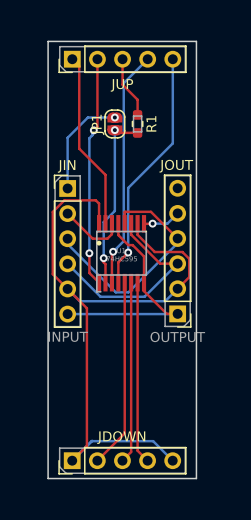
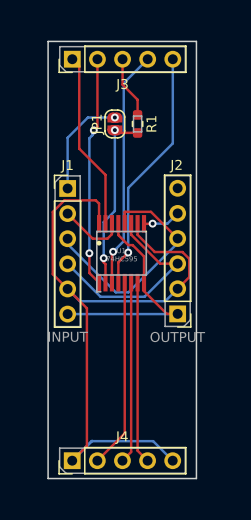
JUP name: JUP (121, 85) -> J3 (121, 85)
JIN name: JIN (66, 166) -> J1 (66, 166)
JOUT name: JOUT (176, 166) -> J2 (175, 166)
JDOWN name: JDOWN (121, 437) -> J4 (121, 437)

